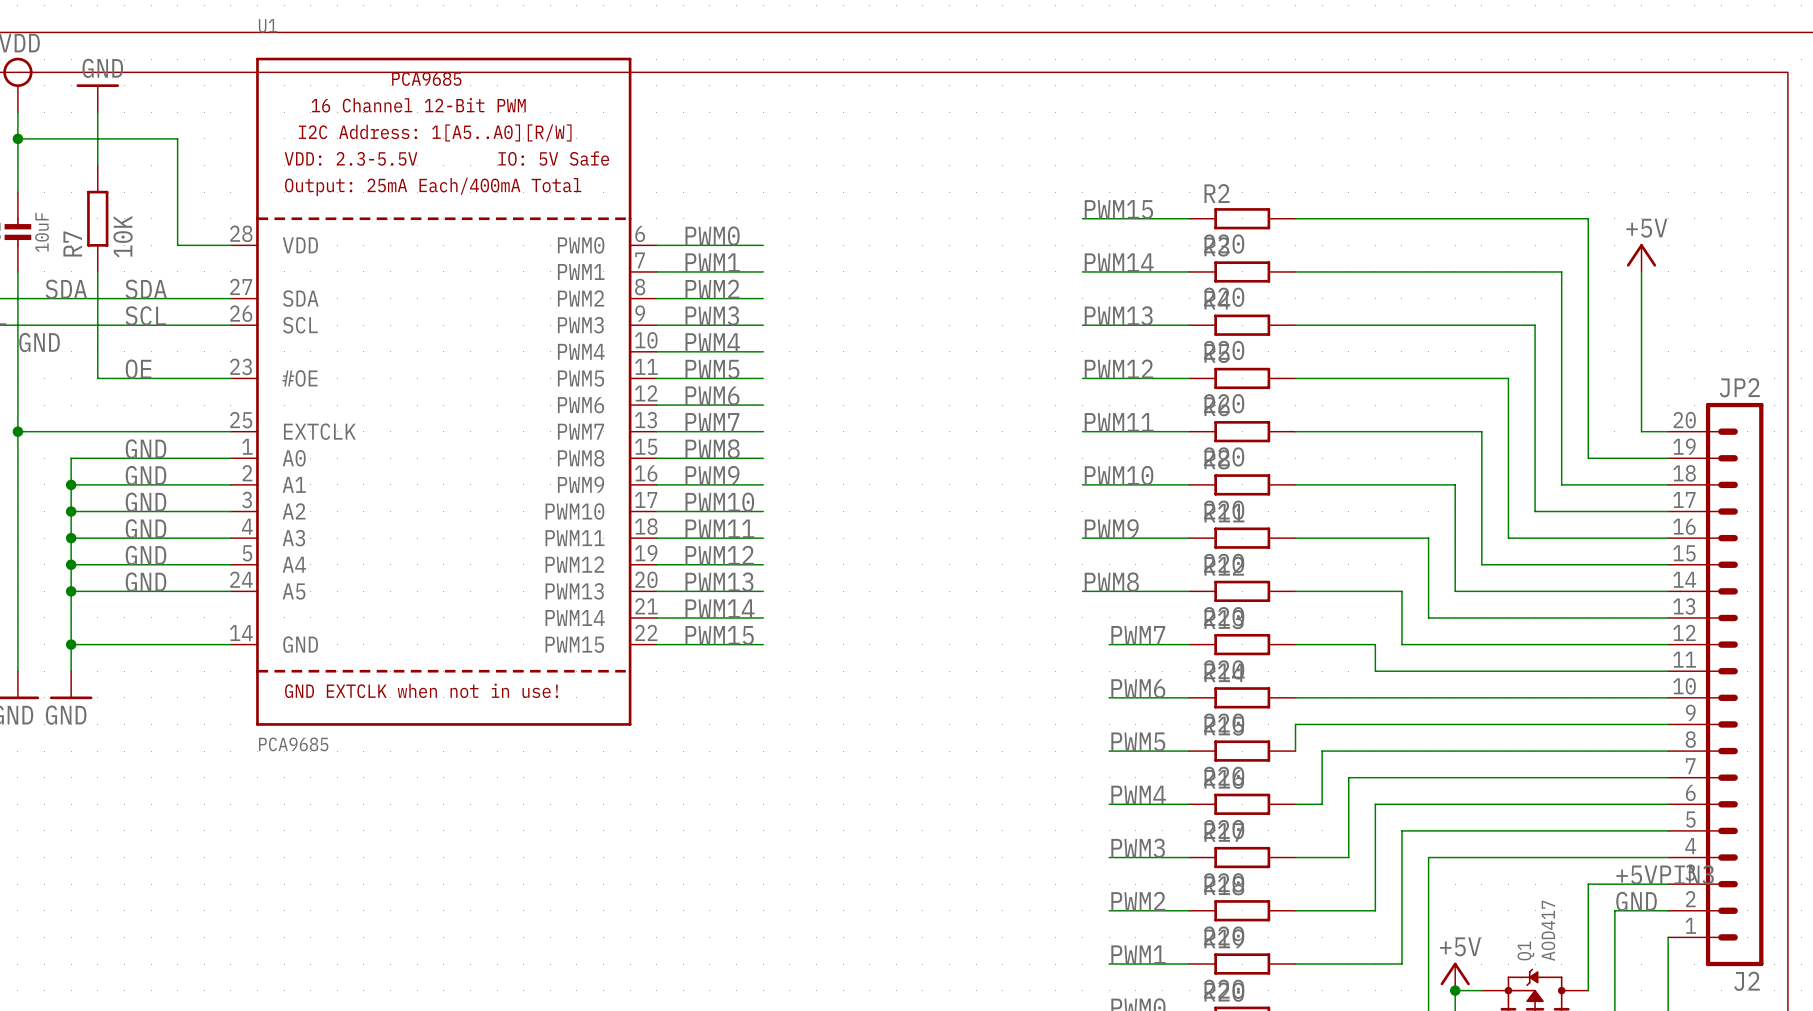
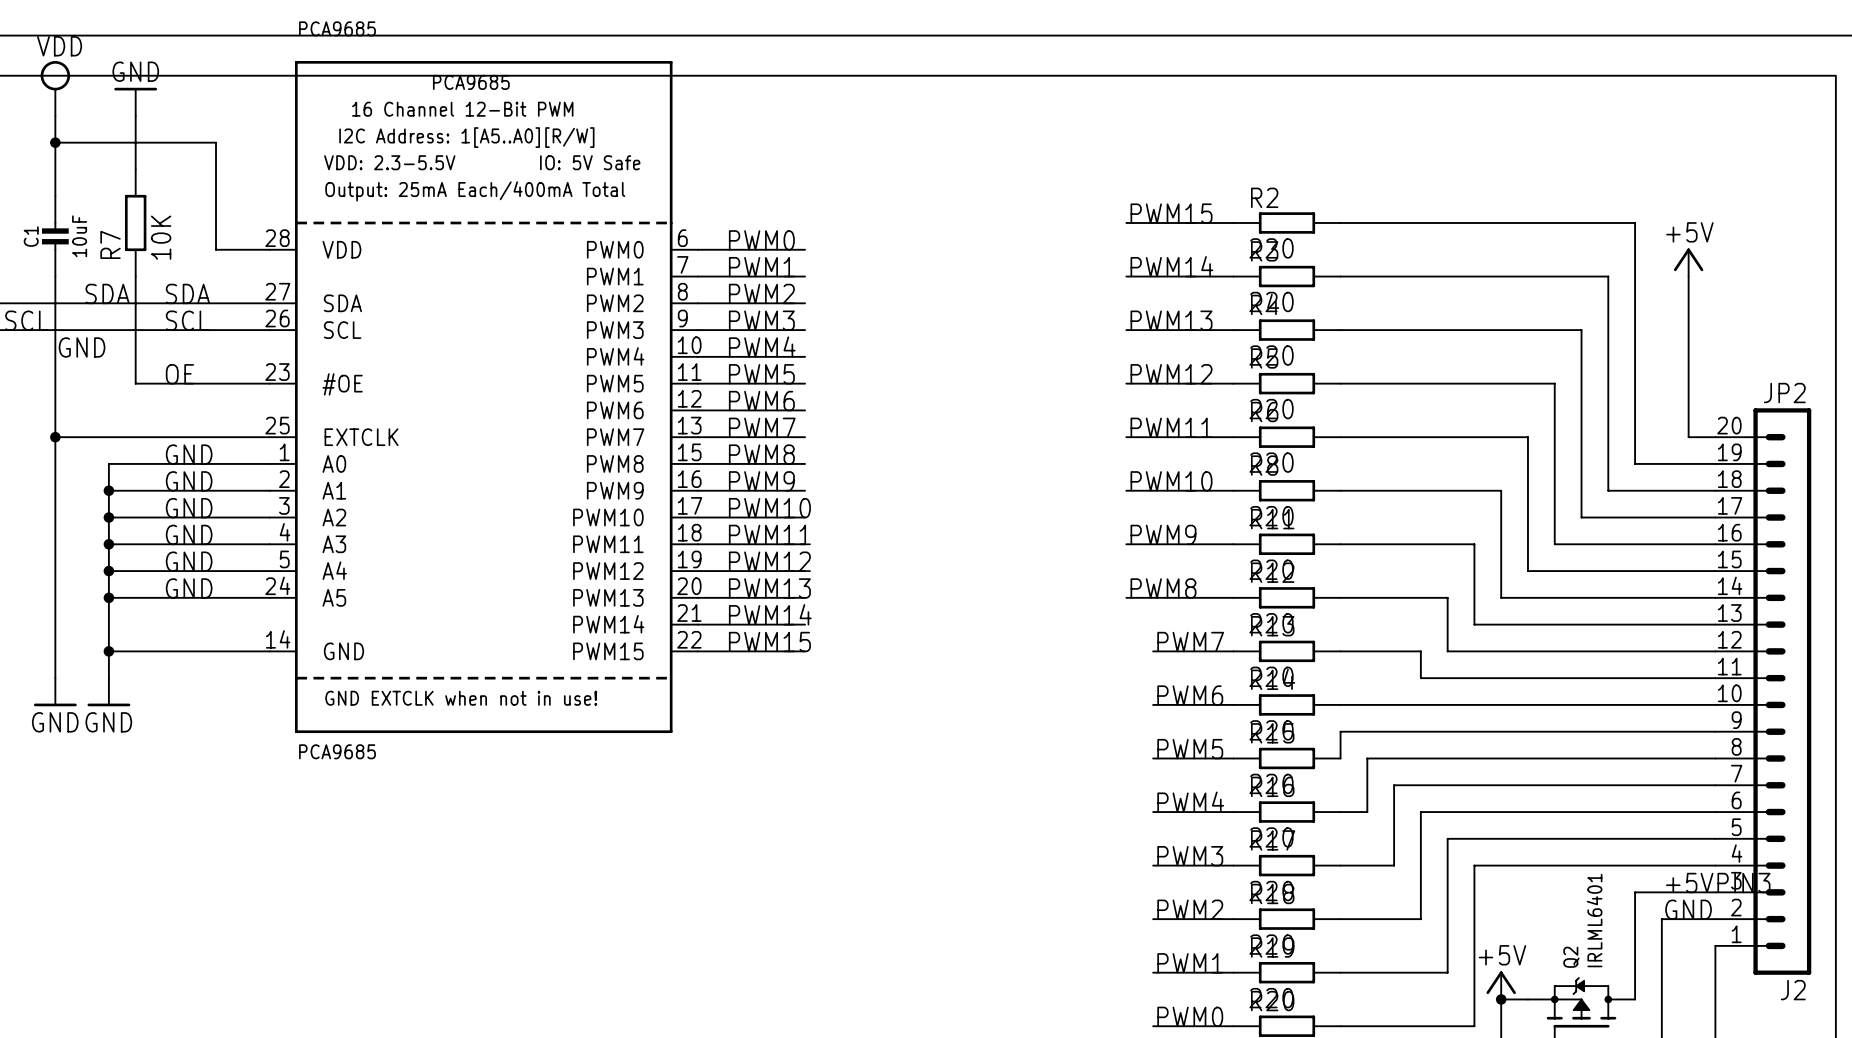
U1 name: U1 (268, 25) -> PCA9685 (337, 28)
Q1 value: AOD417 (1548, 930) -> IRLML6401 (1594, 920)
Q1 name: Q1 (1525, 950) -> Q2 (1571, 957)

